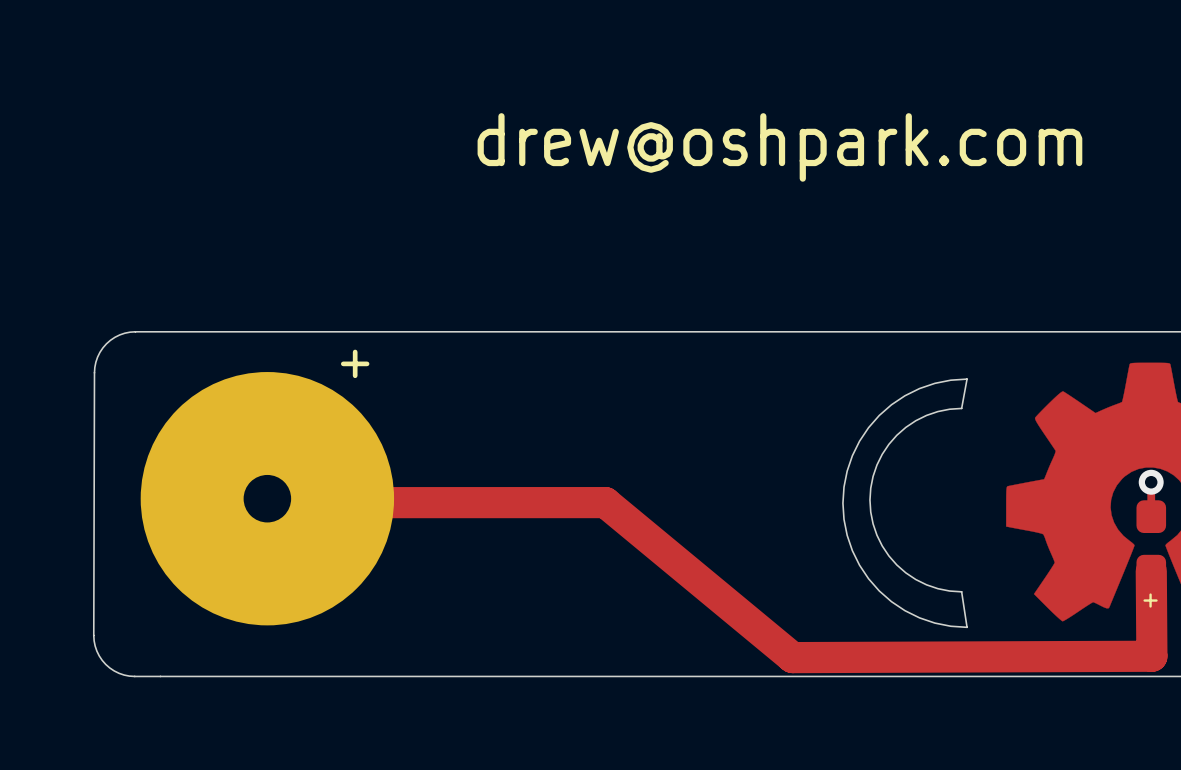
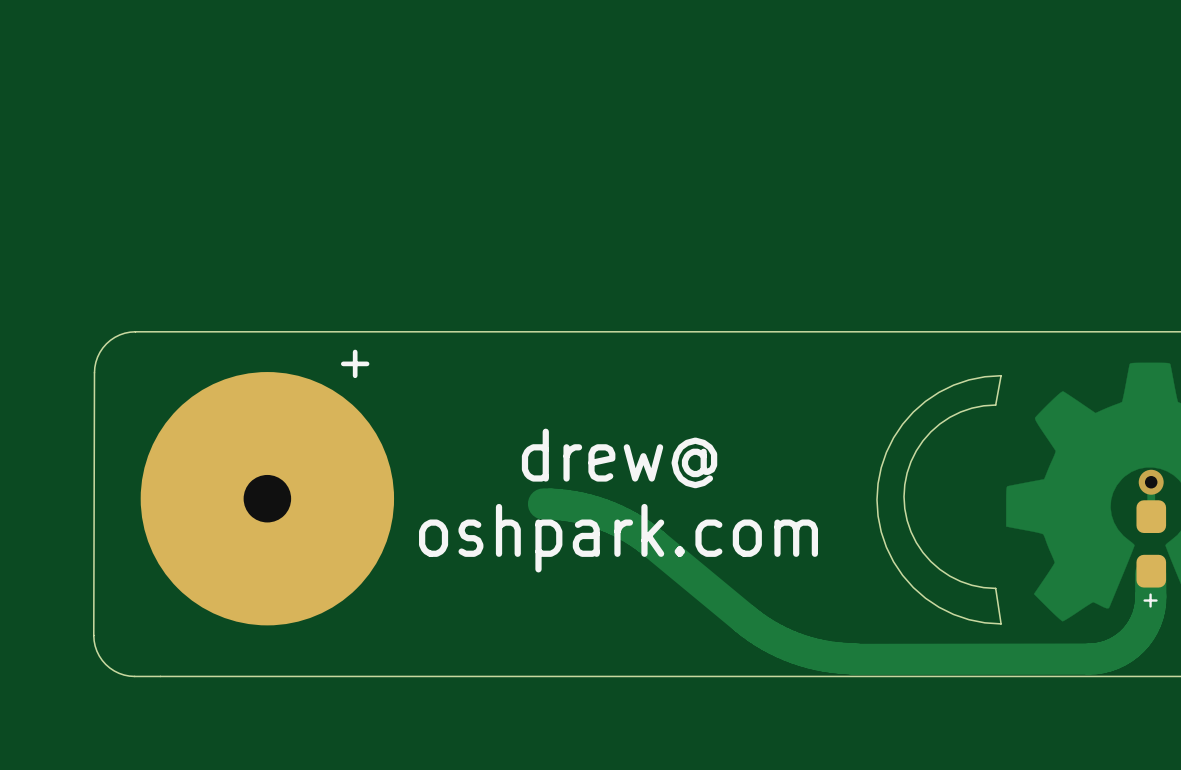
text: drew@oshpark.com (779, 147) -> none
board edge: (967, 379) (961, 408) (937, 411) (926, 415) (905, 427) (888, 444) (876, 465) (870, 488) (869, 500) (870, 512) (876, 535) (888, 555) (905, 572) (926, 584) (937, 588) (961, 591) (967, 627) (934, 623) (919, 617) (904, 610) (879, 590) (868, 578) (852, 550) (847, 535) (842, 503) (847, 471) (852, 455) (868, 427) (879, 415) (904, 395) (919, 388) (934, 383) (967, 379) -> (1001, 375) (995, 405) (971, 408) (949, 417) (939, 423) (922, 440) (916, 450) (907, 472) (904, 496) (907, 520) (916, 542) (922, 552) (939, 569) (960, 581) (971, 585) (995, 588) (1001, 623) (968, 619) (953, 614) (939, 607) (913, 587) (902, 575) (886, 547) (881, 531) (876, 499) (881, 467) (886, 452) (902, 424) (913, 412) (939, 392) (953, 385) (968, 379) (1001, 375)
text: none -> drew@ (619, 458)
track: (276, 502) (605, 502) (792, 657) (1151, 656) (1151, 571) -> none
track: none -> (543, 503) (587, 509) (629, 526) (653, 543) (750, 623) (776, 639) (818, 654) (855, 658)
text: none -> oshpark.com (618, 538)
track: none -> (1150, 573) (1150, 602) (1143, 626) (1128, 644) (1106, 656) (1088, 659) (853, 659)

